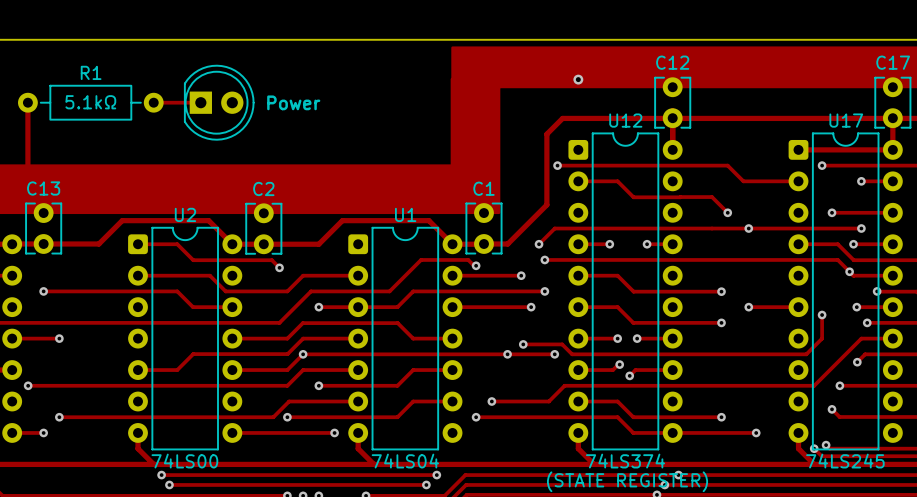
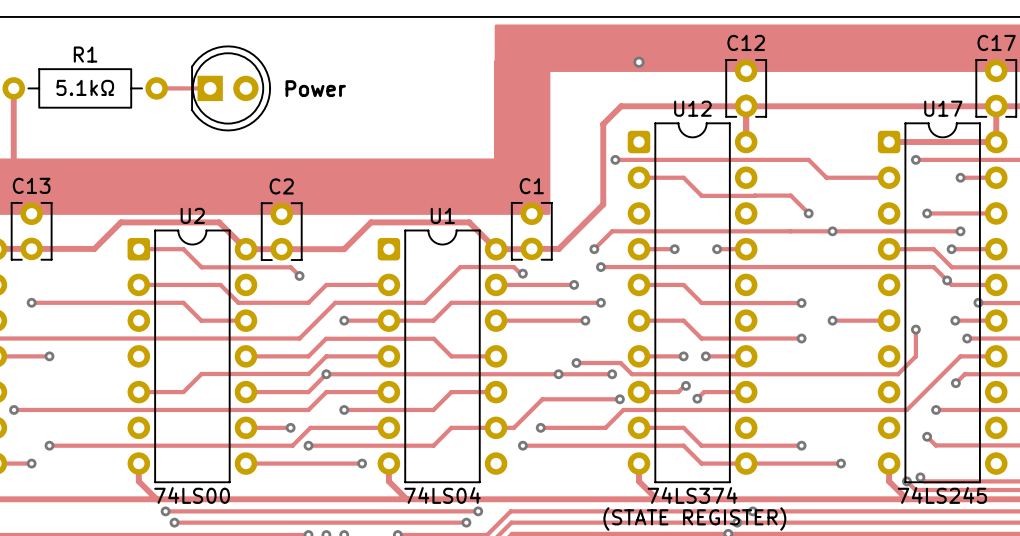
track: none -> (619, 399) (542, 399) (513, 427) (496, 427)
via: none -> (619, 399)
track: none -> (245, 427) (290, 427)
via: none -> (290, 427)

